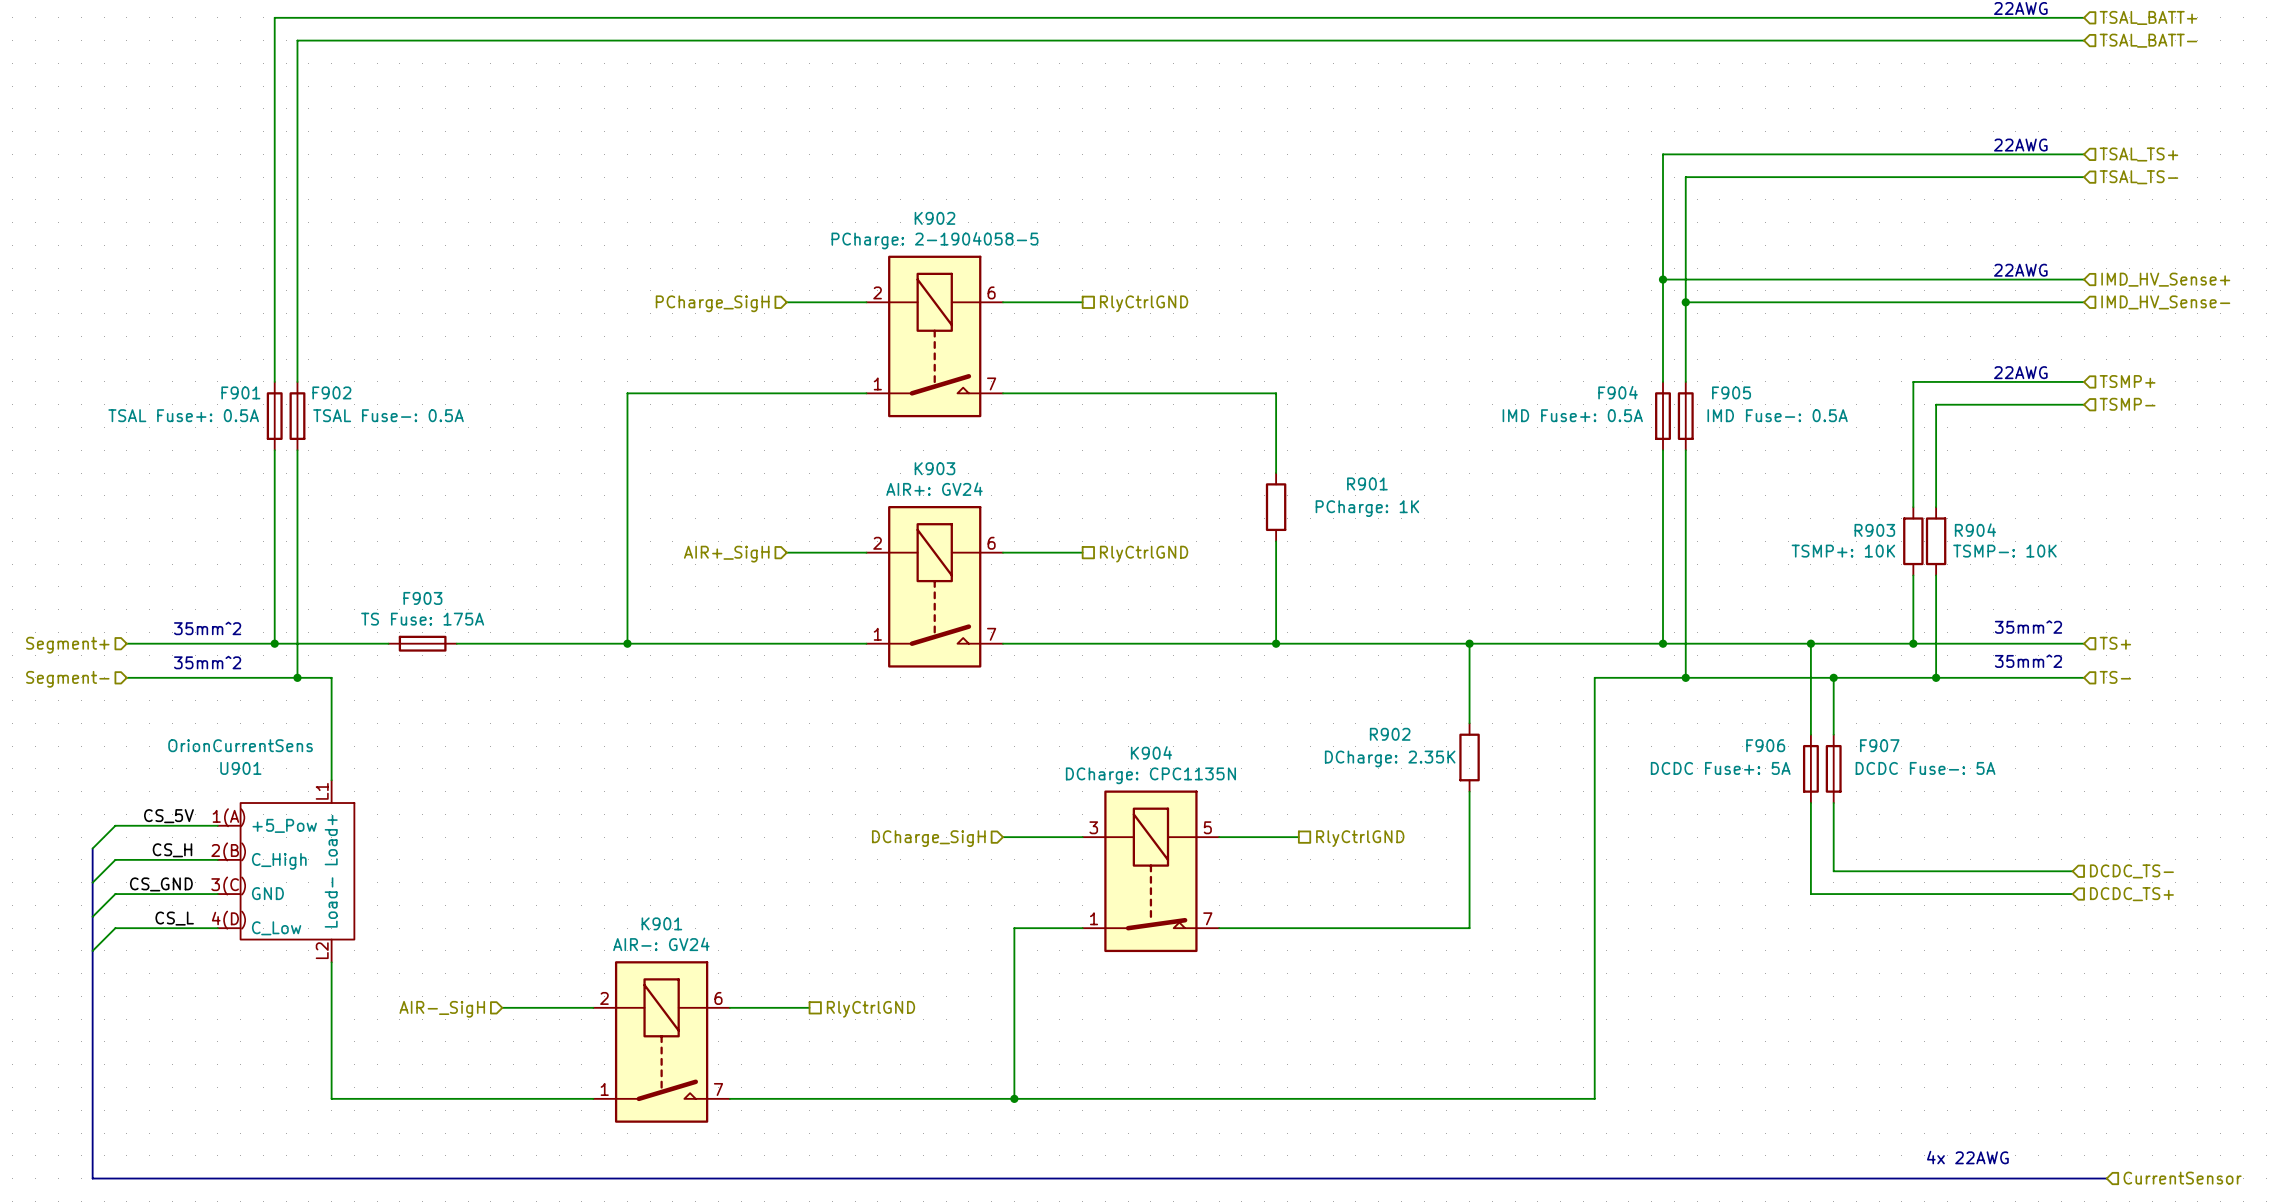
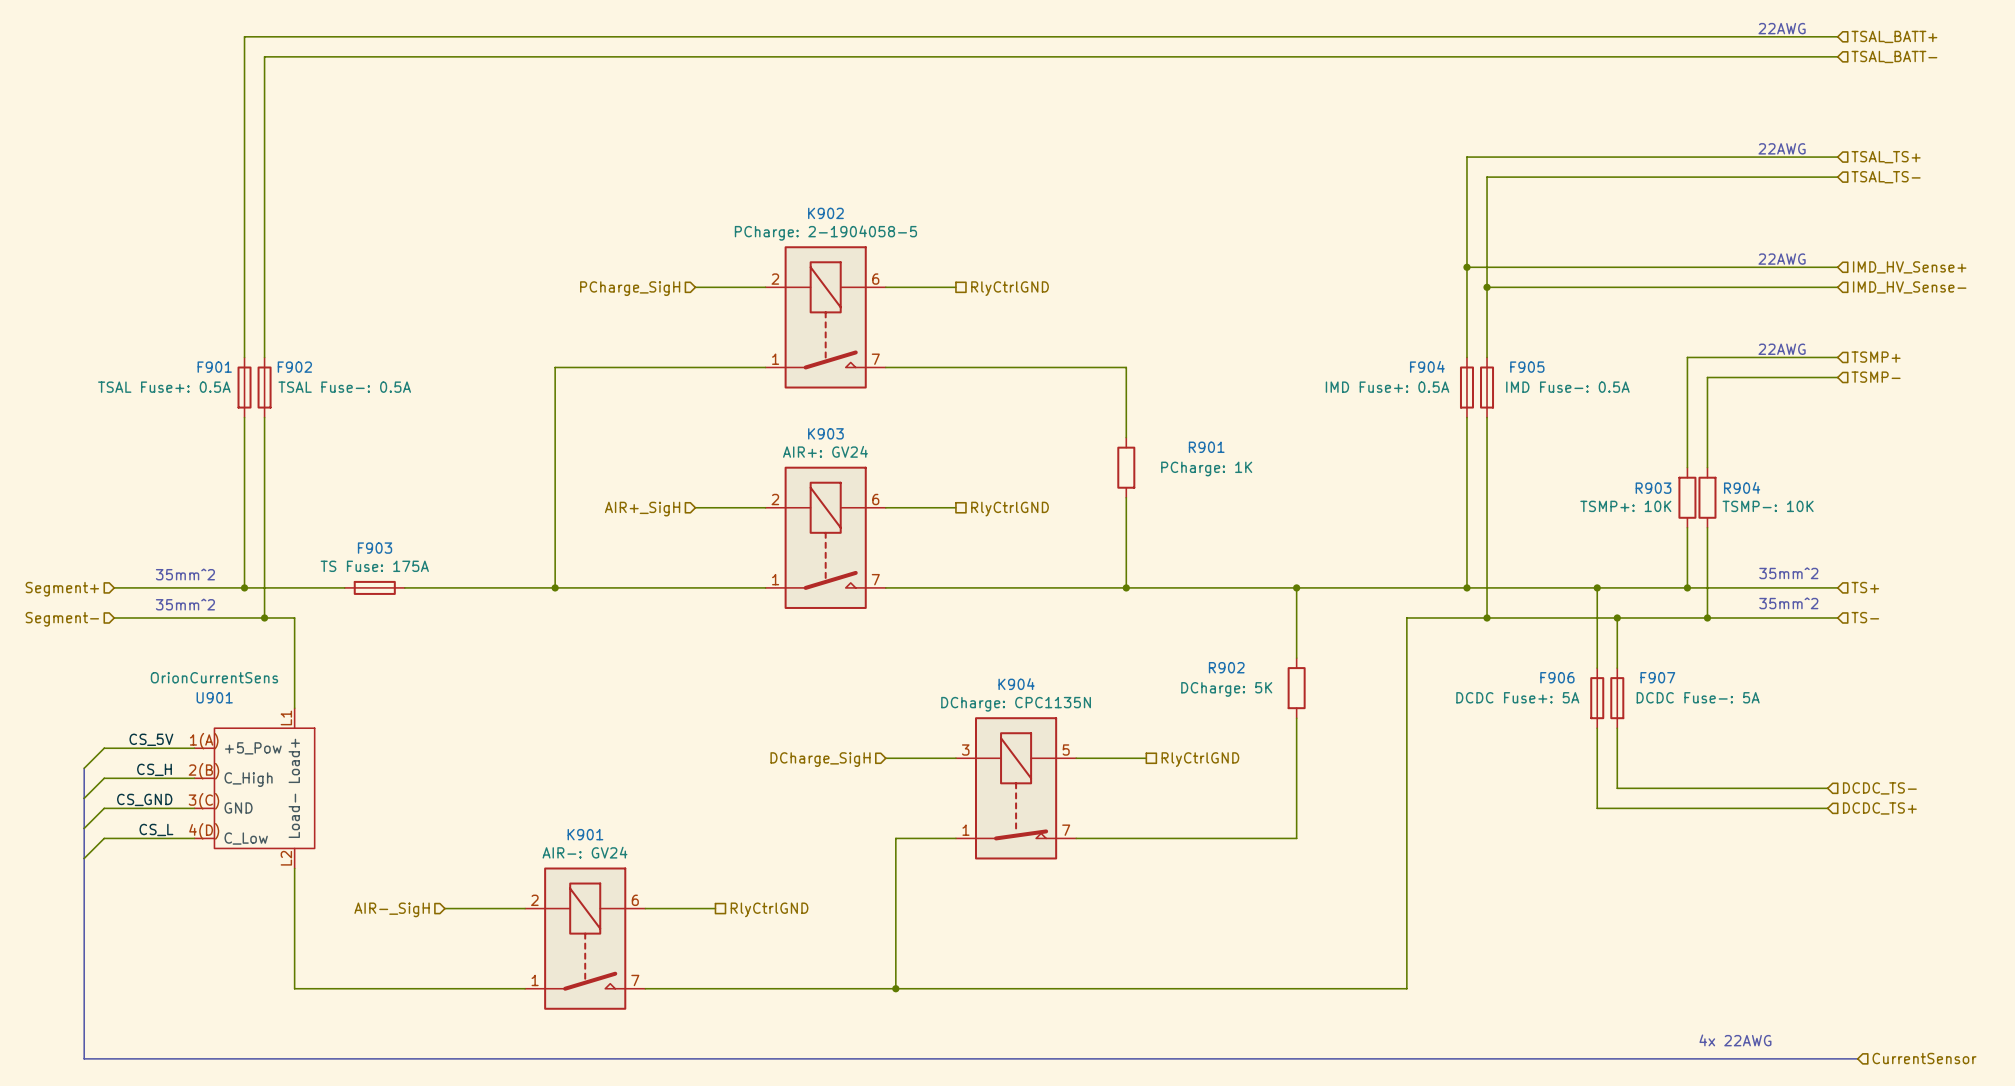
R902 value: DCharge: 2.35K (1390, 758) -> DCharge: 5K (1226, 689)

